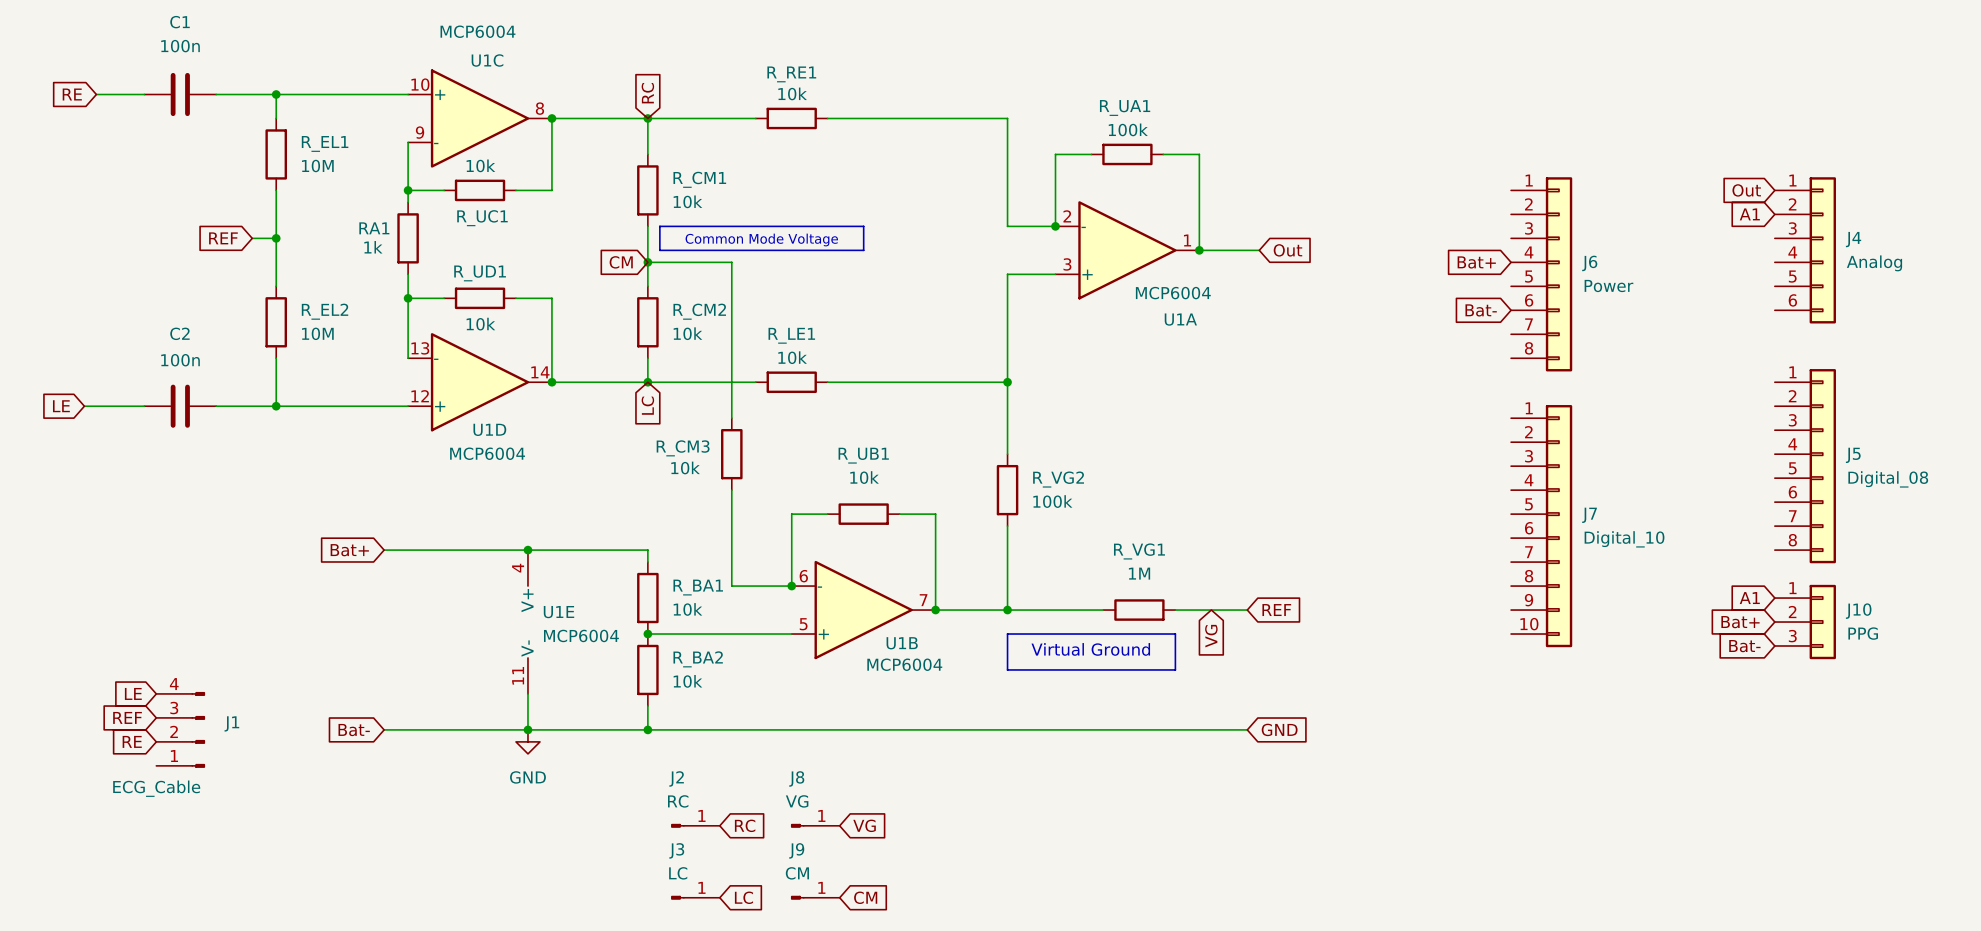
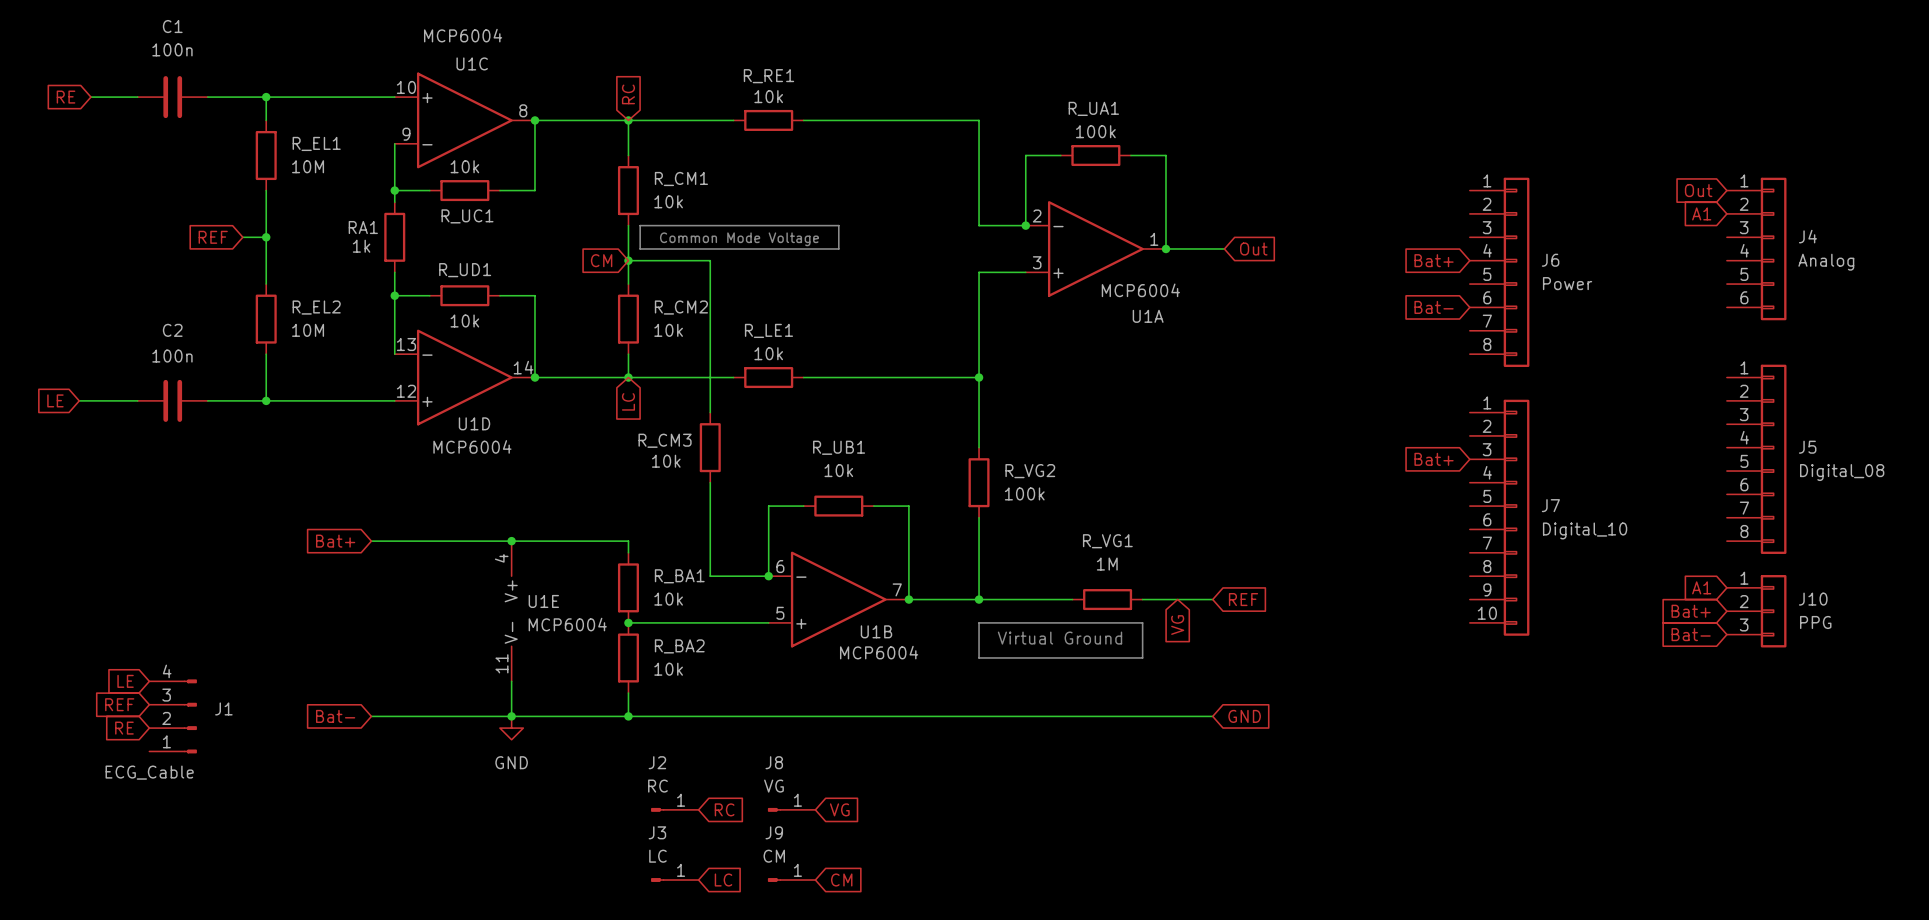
global label: none -> Bat+ (1434, 459)

